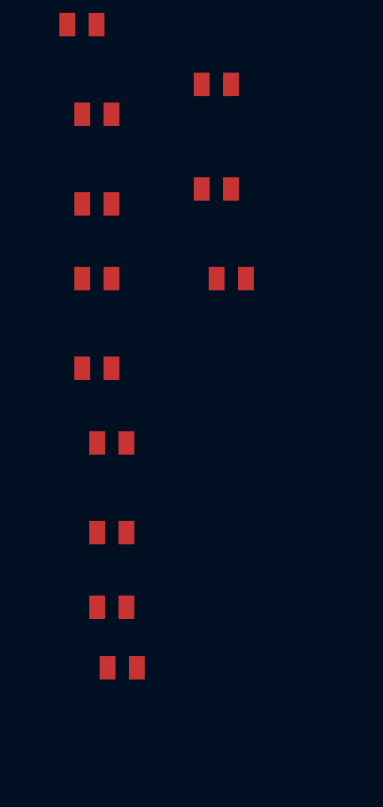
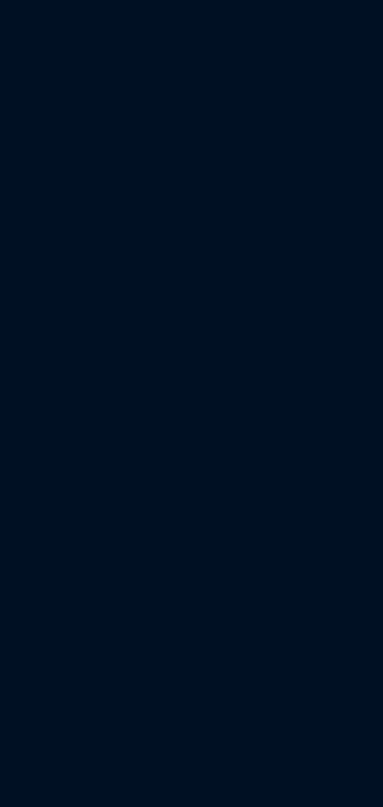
part: (81, 24) -> none
part: (216, 84) -> none
part: (96, 114) -> none
part: (216, 188) -> none
part: (96, 203) -> none
part: (96, 278) -> none
part: (231, 278) -> none
part: (96, 368) -> none
part: (111, 442) -> none
part: (111, 532) -> none
part: (111, 607) -> none
part: (122, 667) -> none

